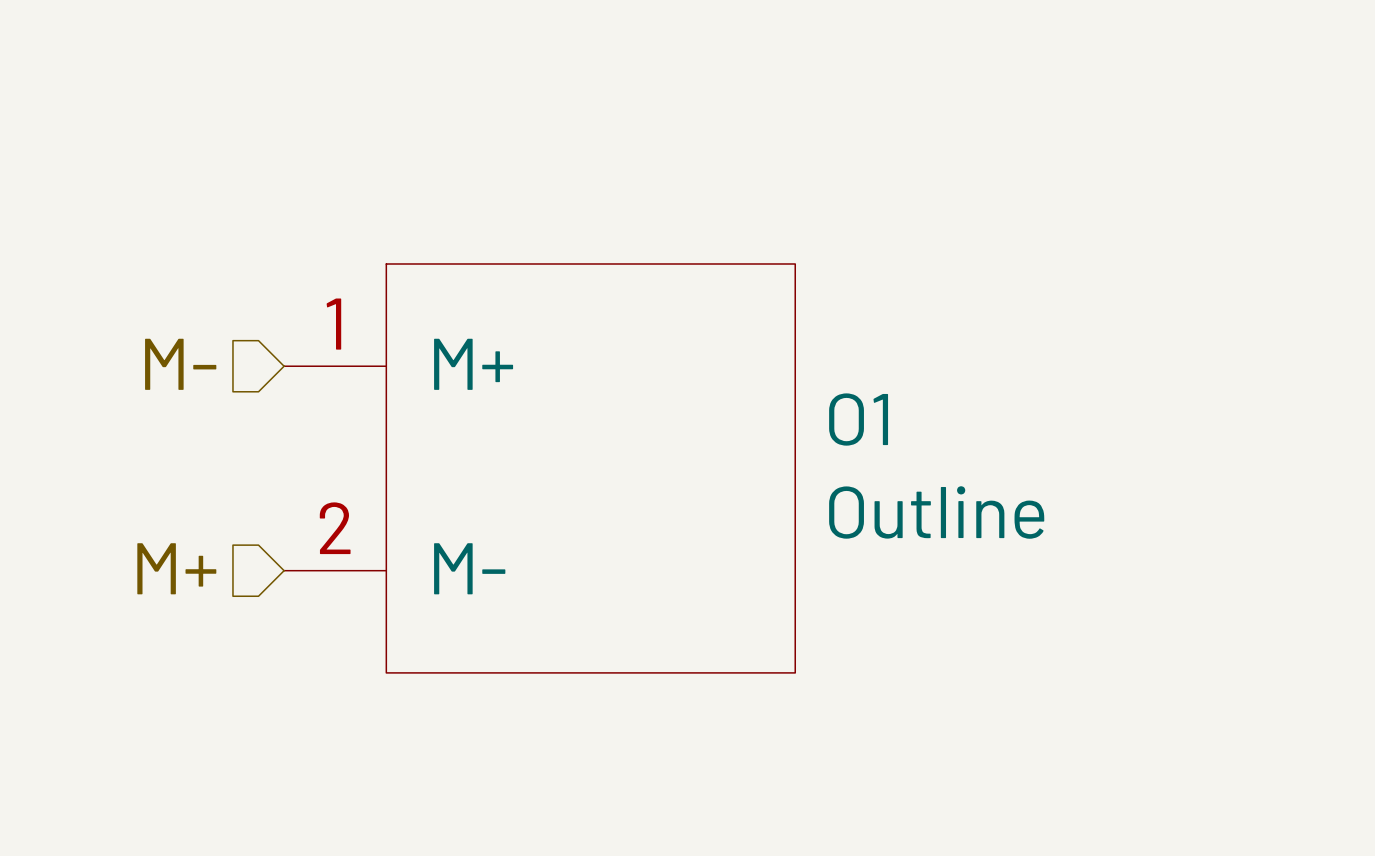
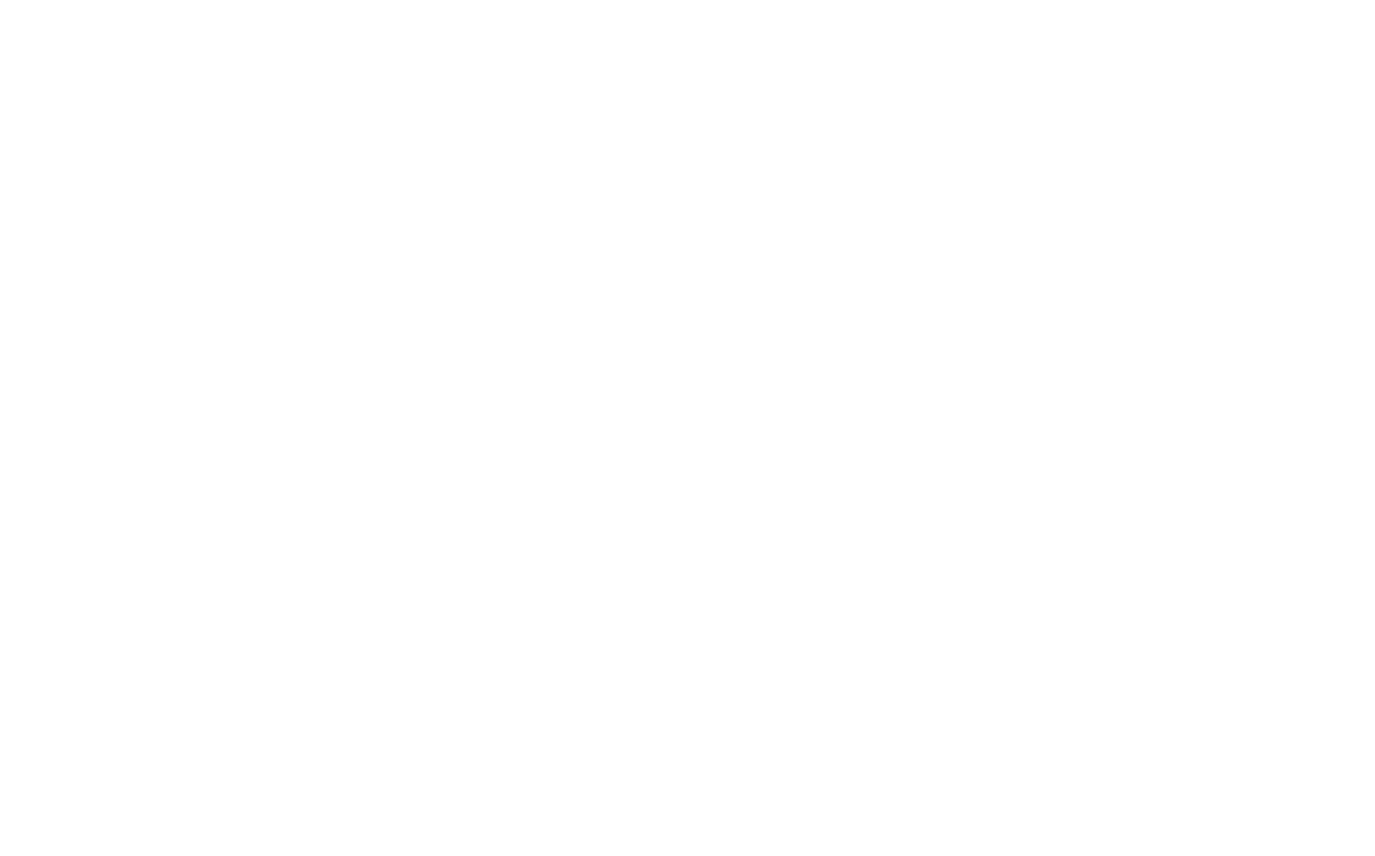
hierarchical label: M- (180, 364) -> none
O1: Outline (539, 468) -> none
hierarchical label: M+ (176, 568) -> none

